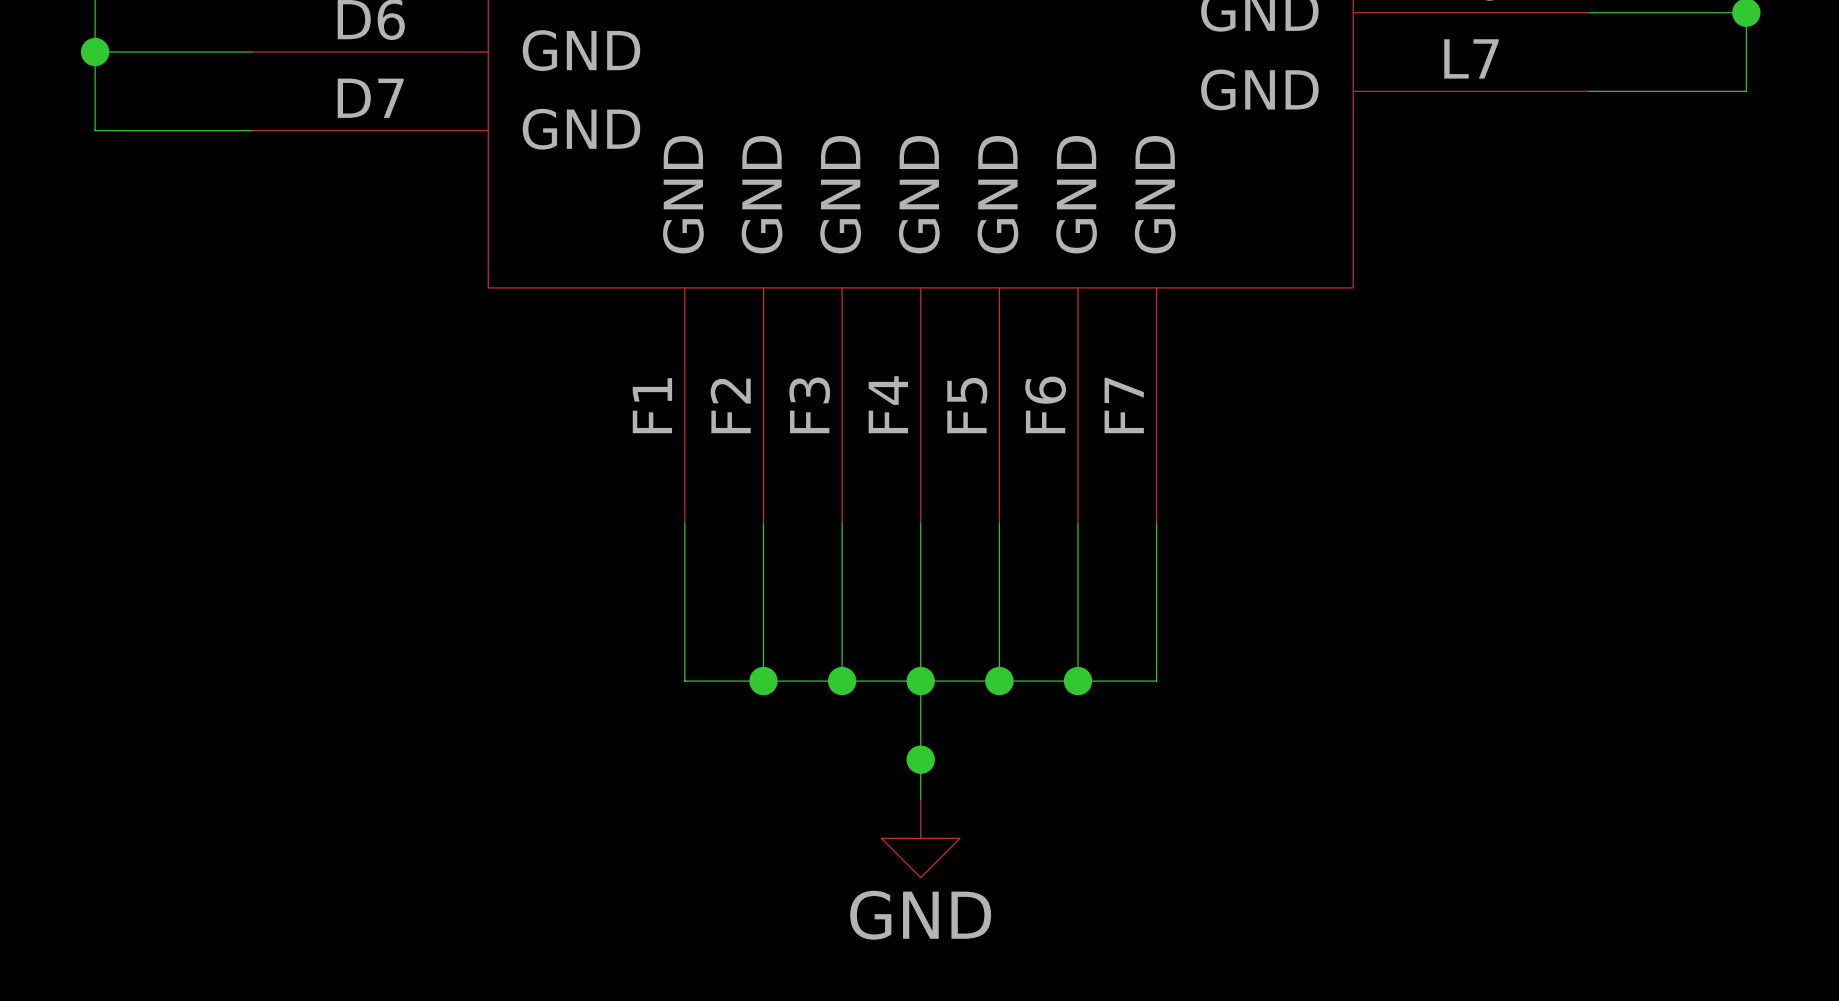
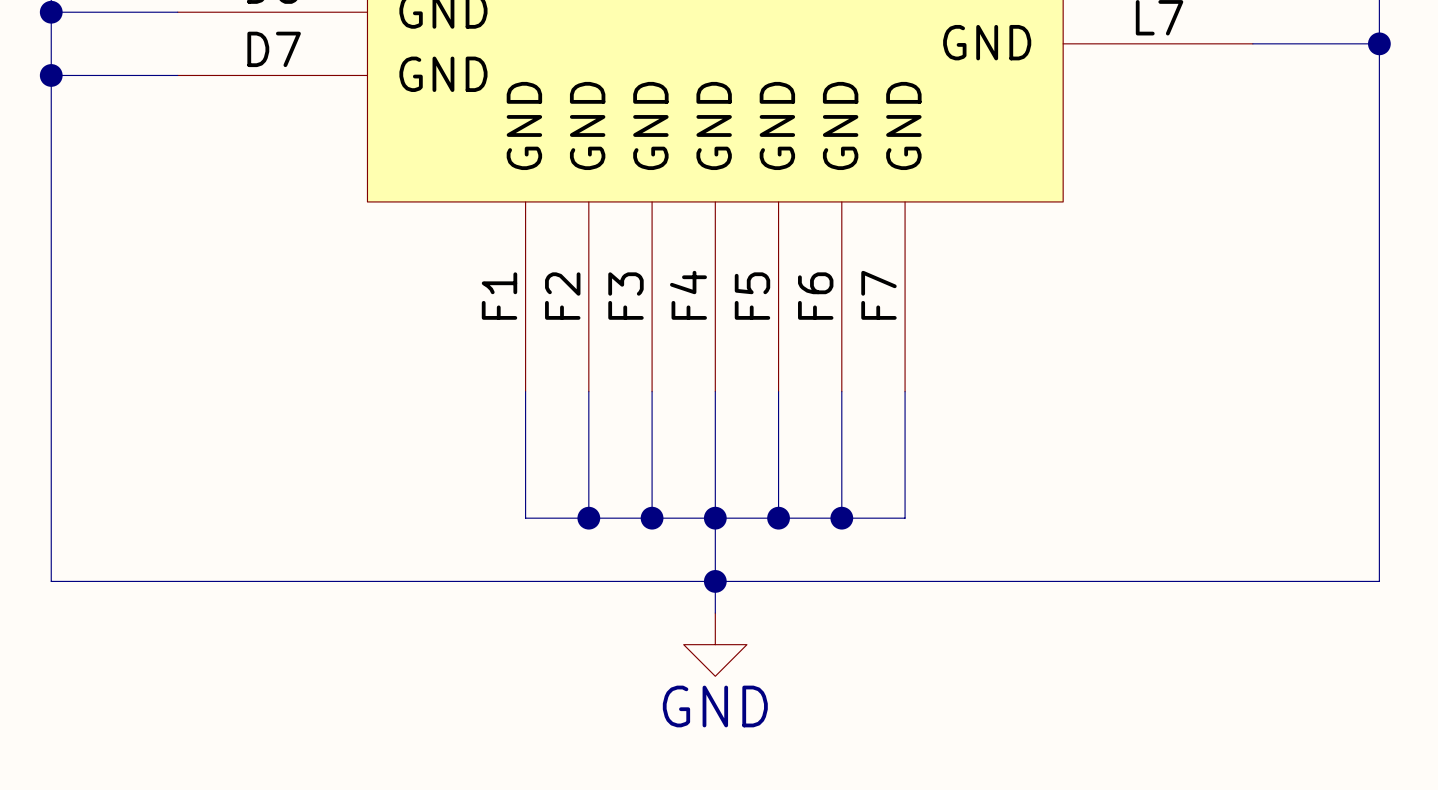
wire: none -> (1379, 43) (1379, 581) (51, 581) (51, 75)
junction: none -> (1379, 43)
junction: none -> (51, 75)

